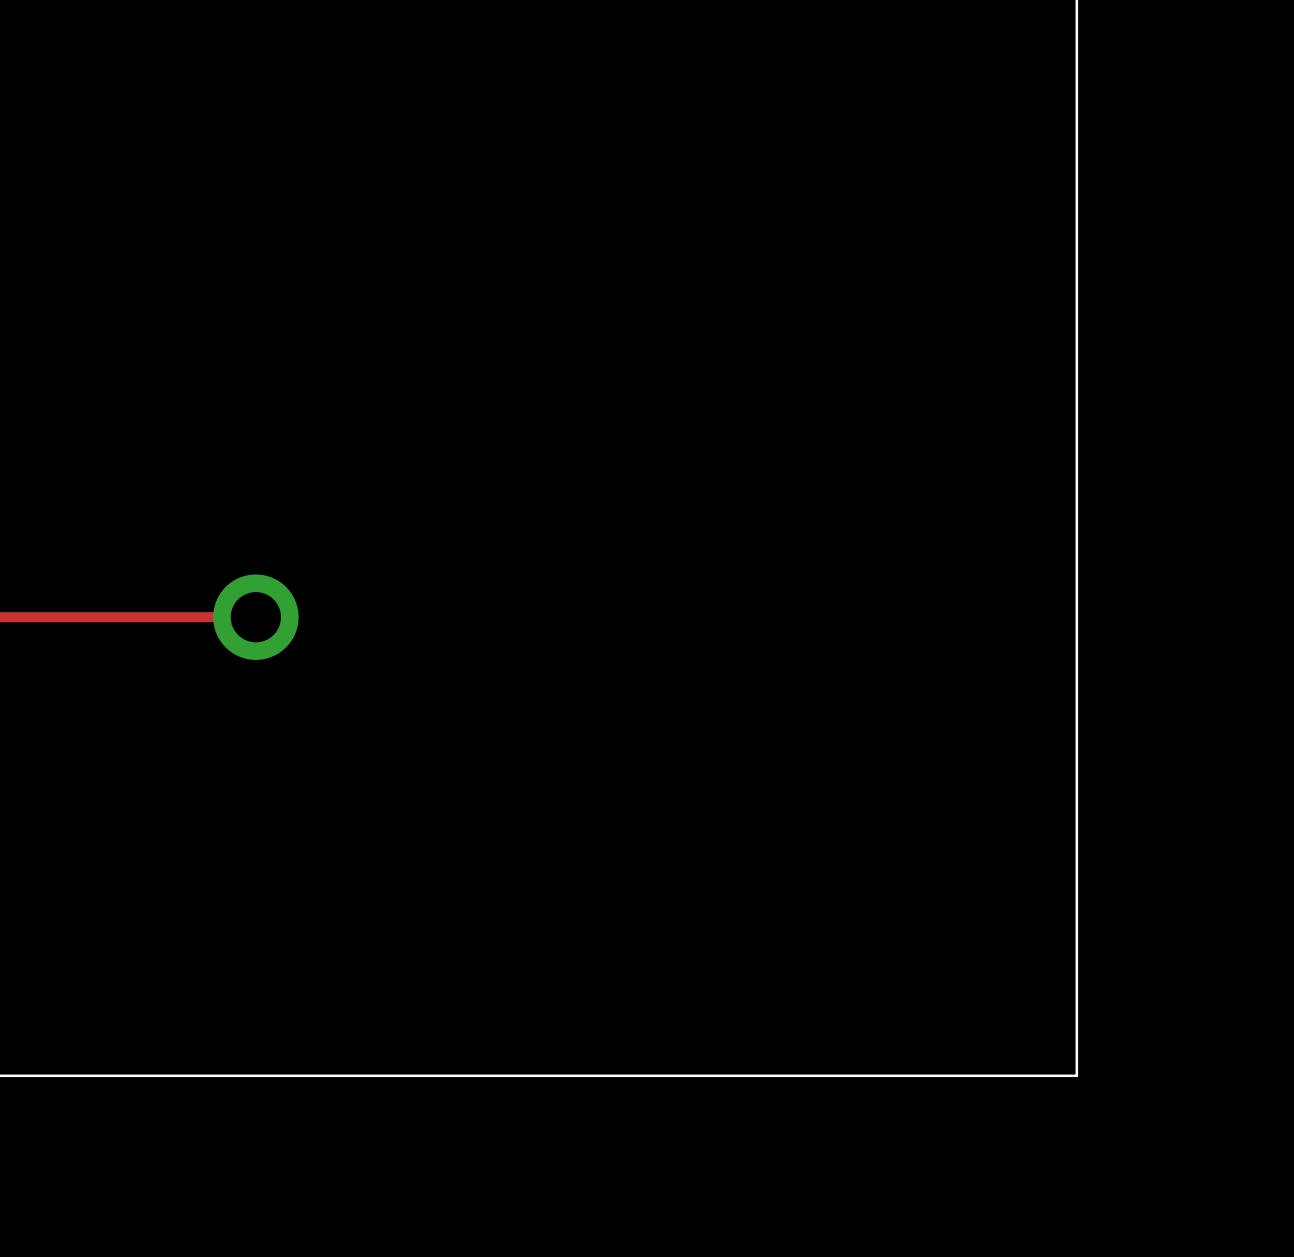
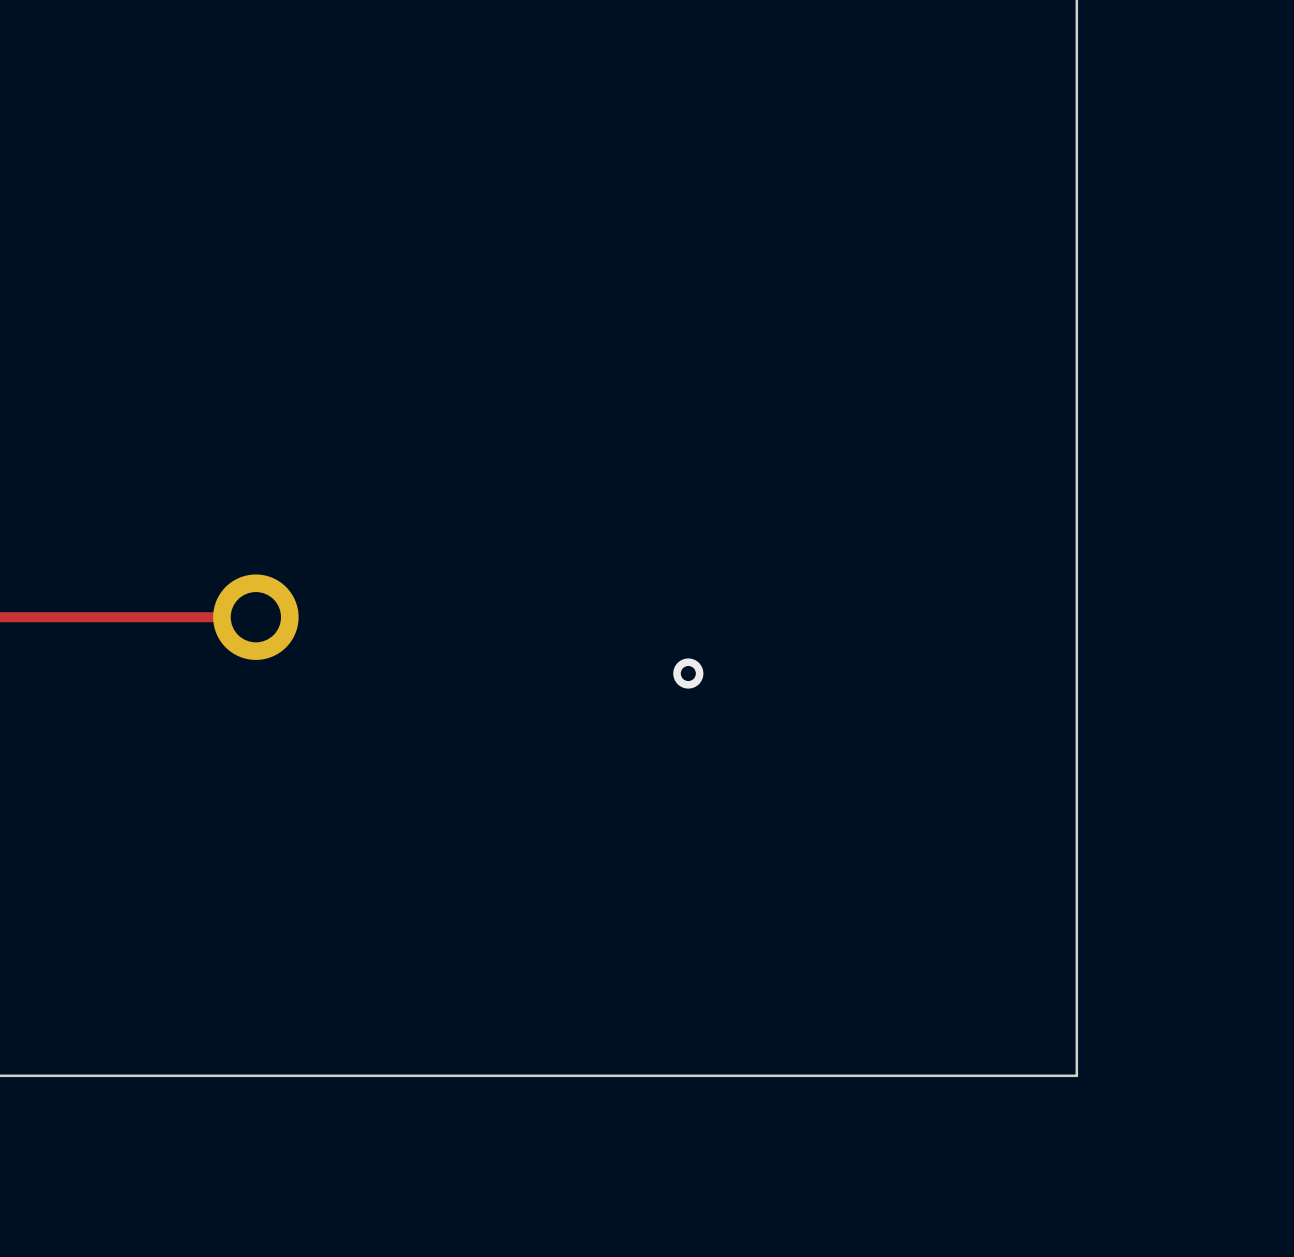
via: none -> (688, 673)

